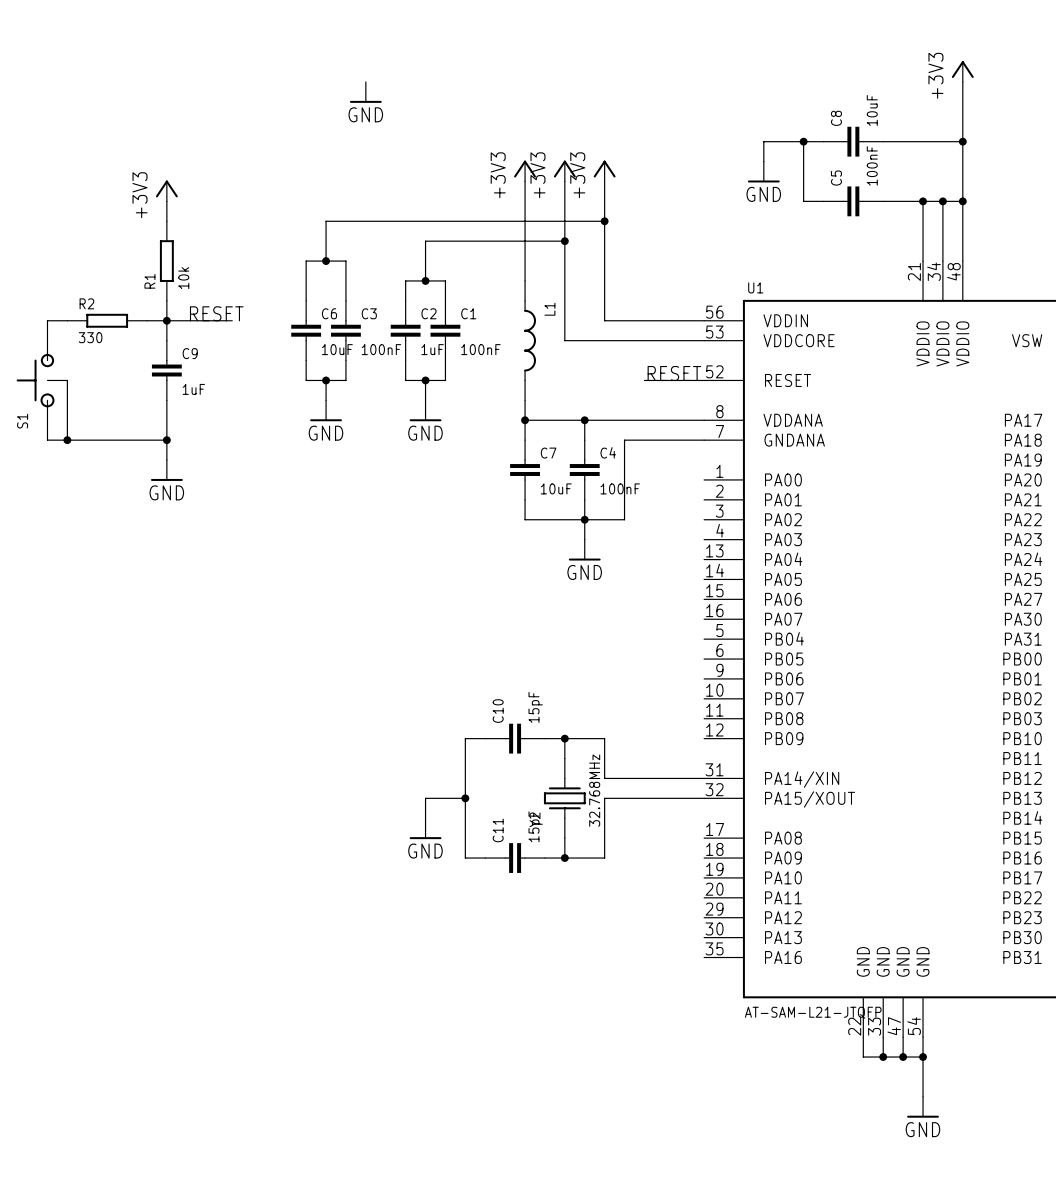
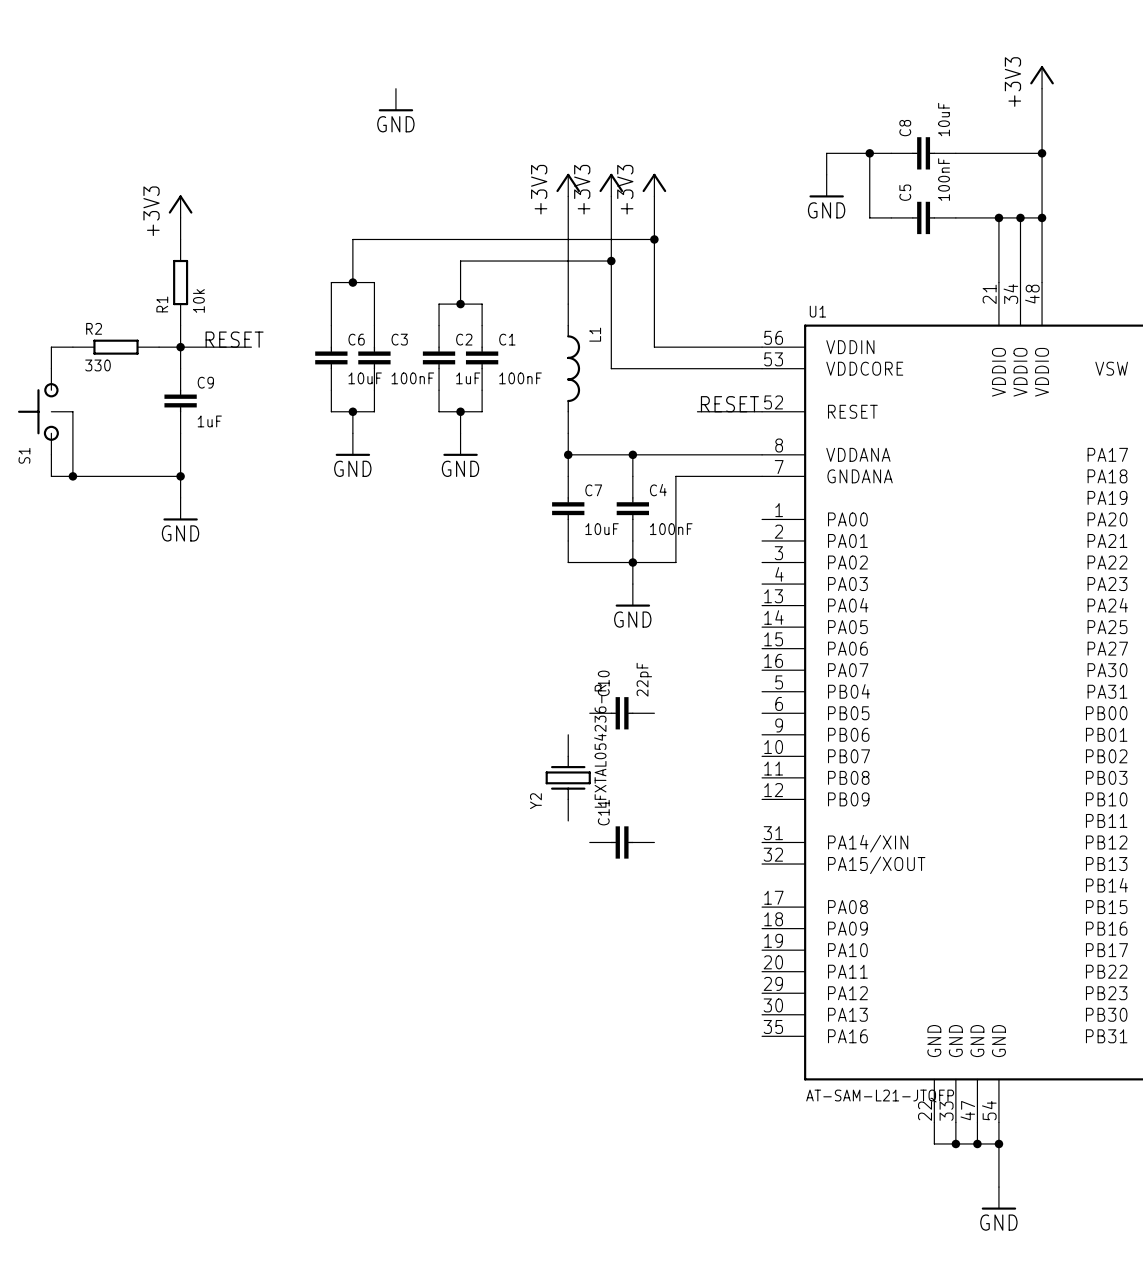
C10 value: 15pF (535, 707) -> 22pF (644, 679)
wire: (485, 738) (465, 738) (465, 858) (485, 858) -> none
C10 position: (515, 738) -> (622, 713)
wire: (544, 738) (604, 738) (604, 778) (704, 778) -> none
wire: (564, 738) (564, 758) -> none
junction: (564, 738) -> none
Y2 value: 32.768MHz (594, 790) -> LFXTAL054236-R (600, 746)
wire: (465, 798) (425, 798) (425, 818) -> none
junction: (465, 798) -> none
Y2 position: (564, 798) -> (568, 777)
wire: (704, 798) (604, 798) (604, 858) (544, 858) -> none
C11 value: 15pF (535, 826) -> none
power symbol: GND (425, 828) -> none
wire: (564, 838) (564, 858) -> none
C11 position: (515, 858) -> (622, 842)
junction: (564, 858) -> none

